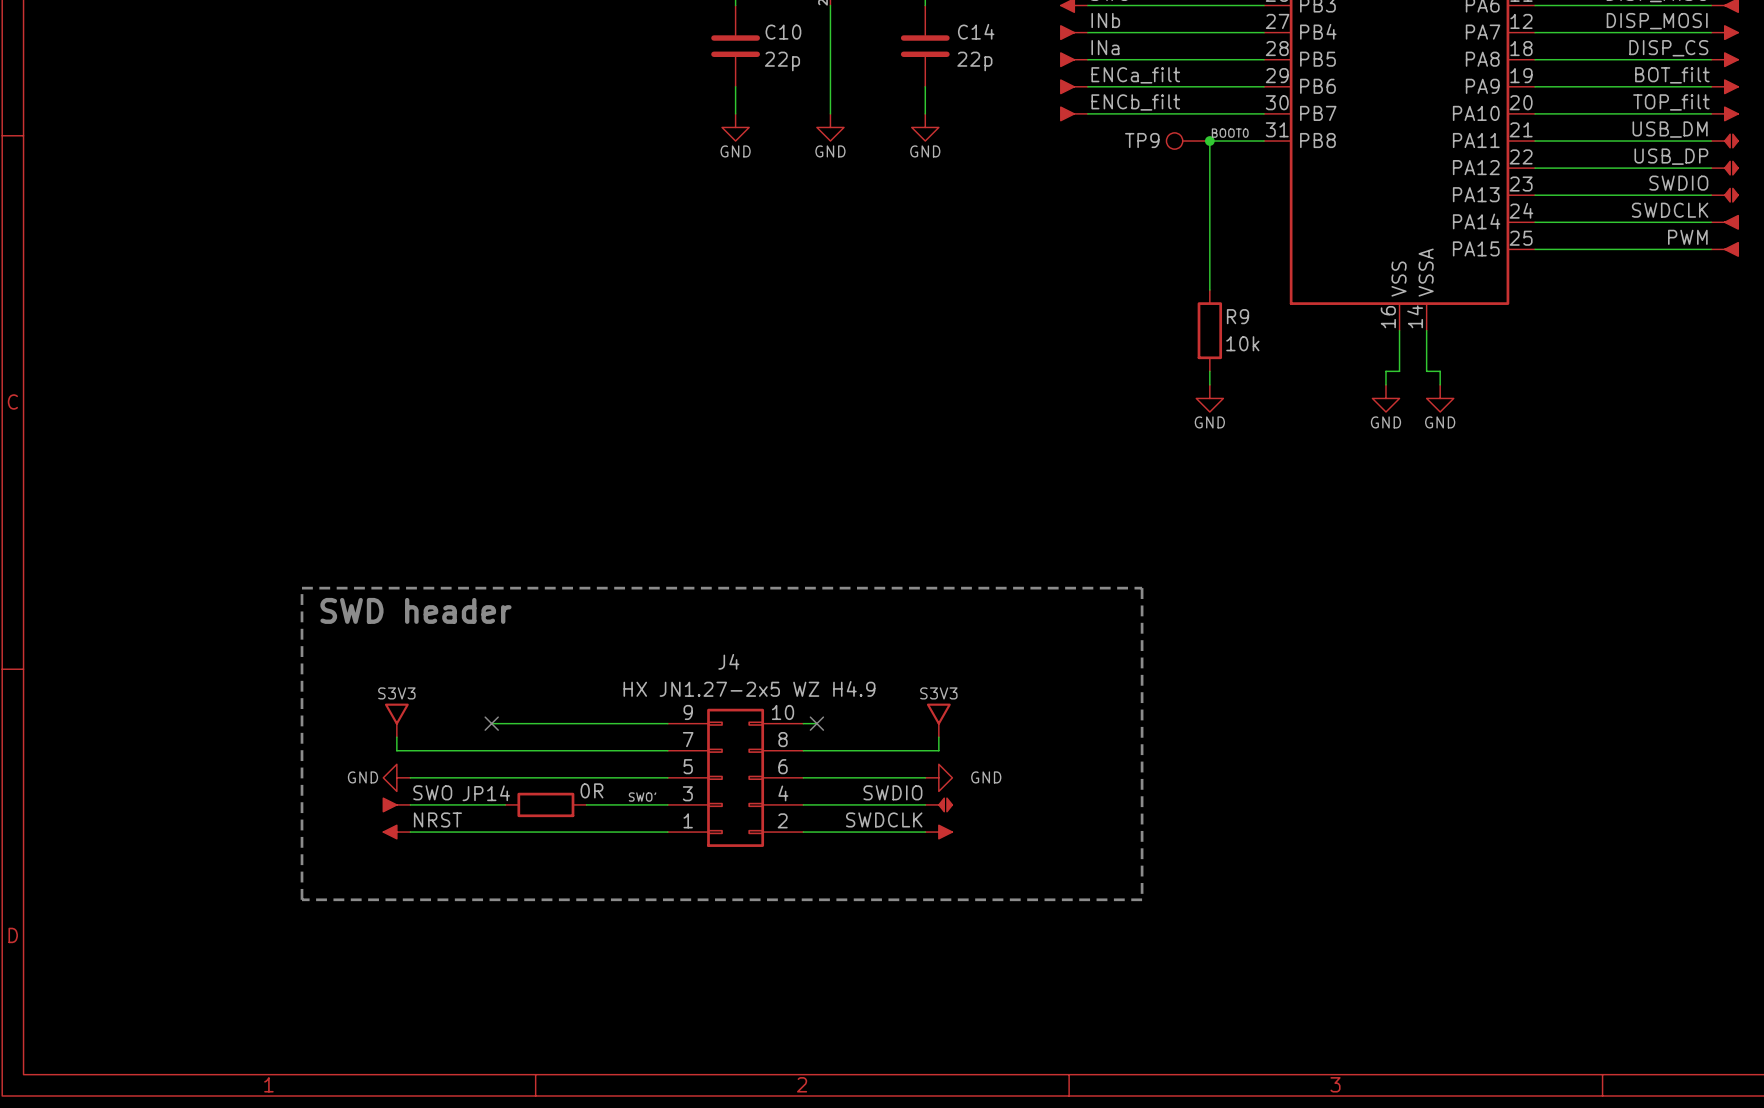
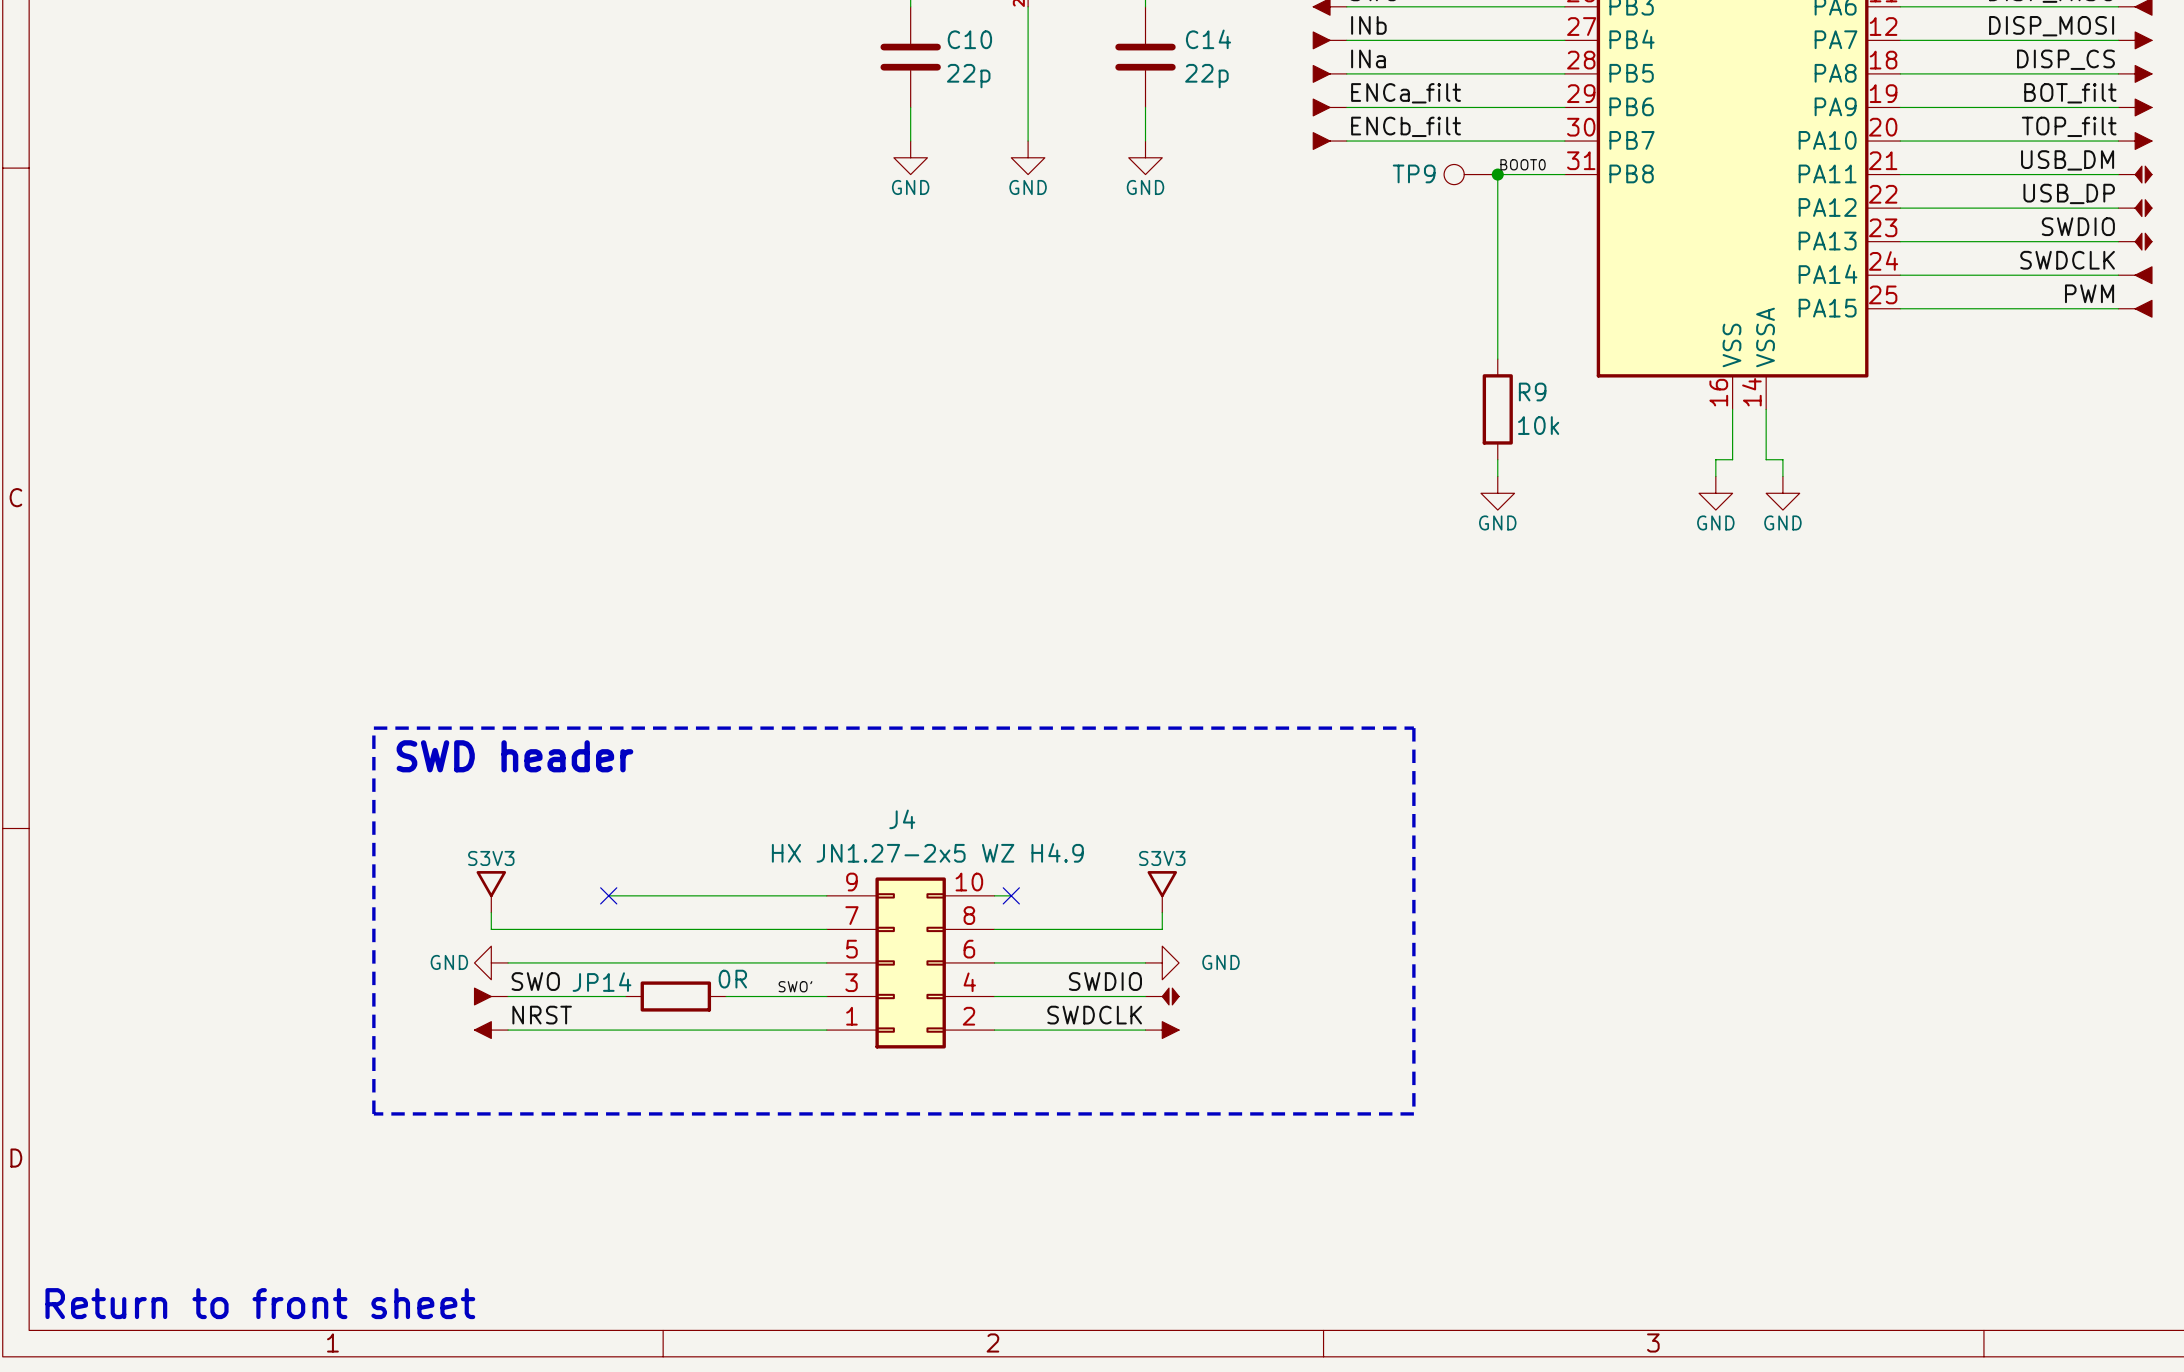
text: none -> Return to front sheet (260, 1303)

